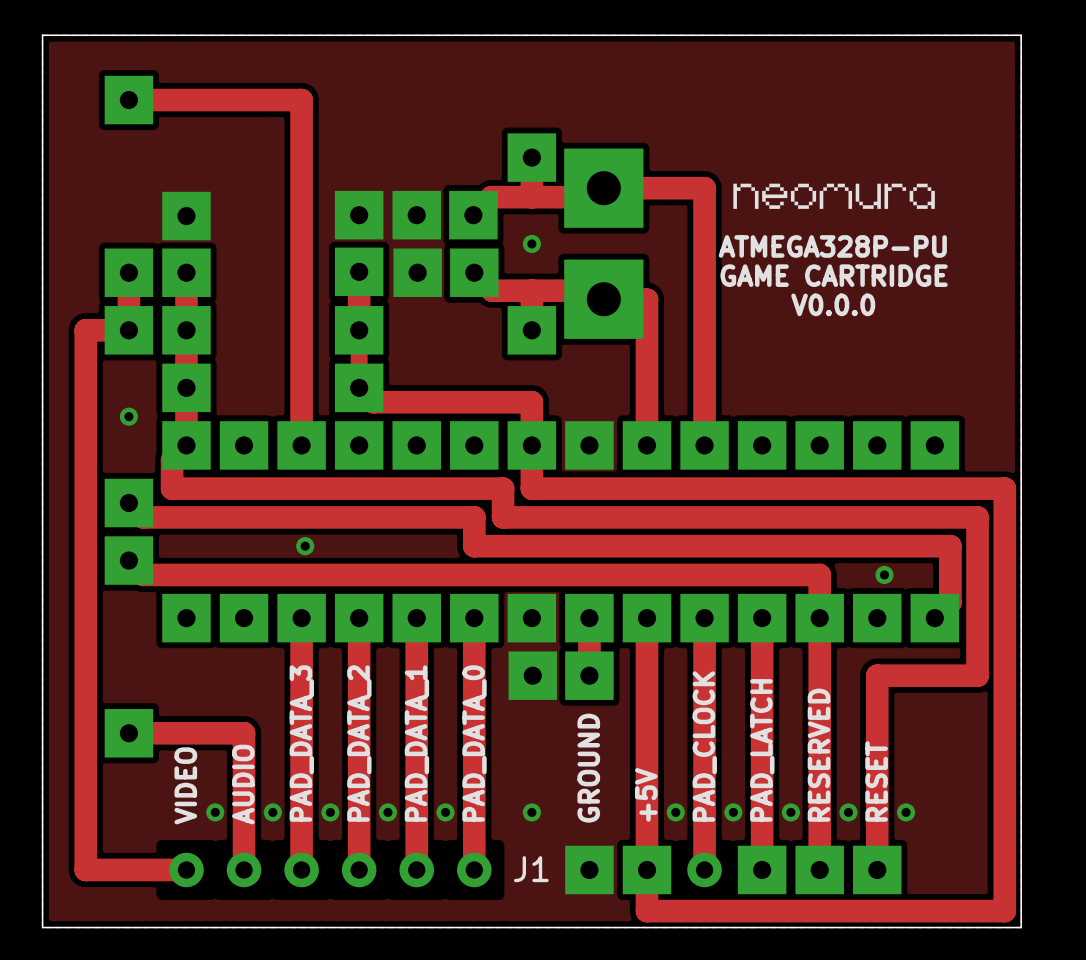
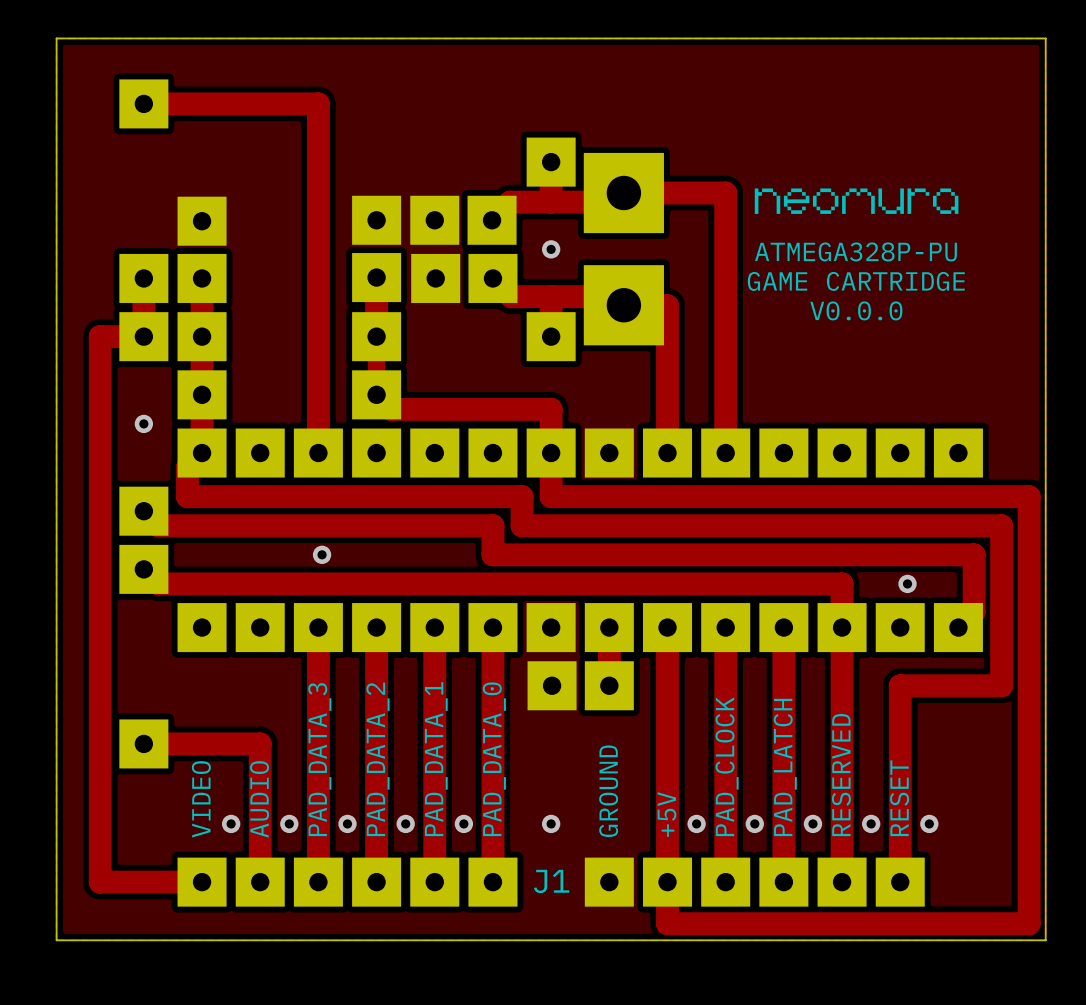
J1 footprint: [169, 845, 902, 895] -> [177, 857, 925, 907]

